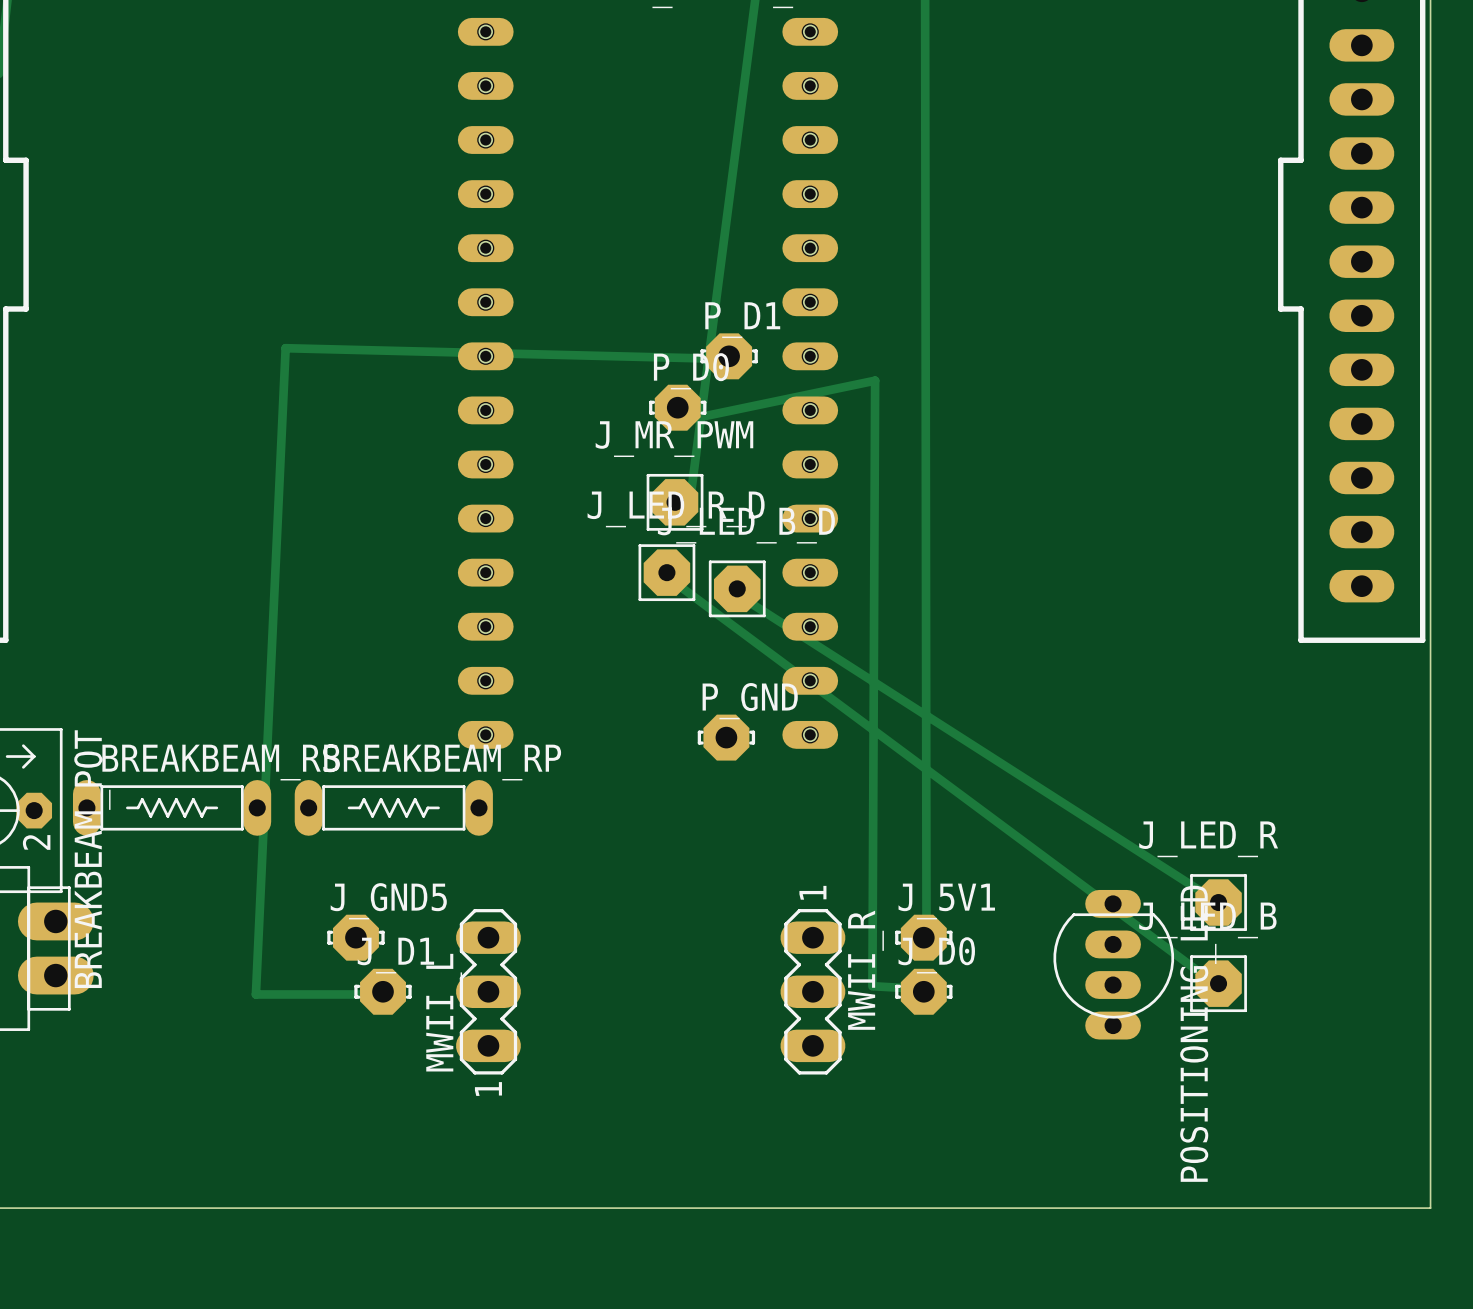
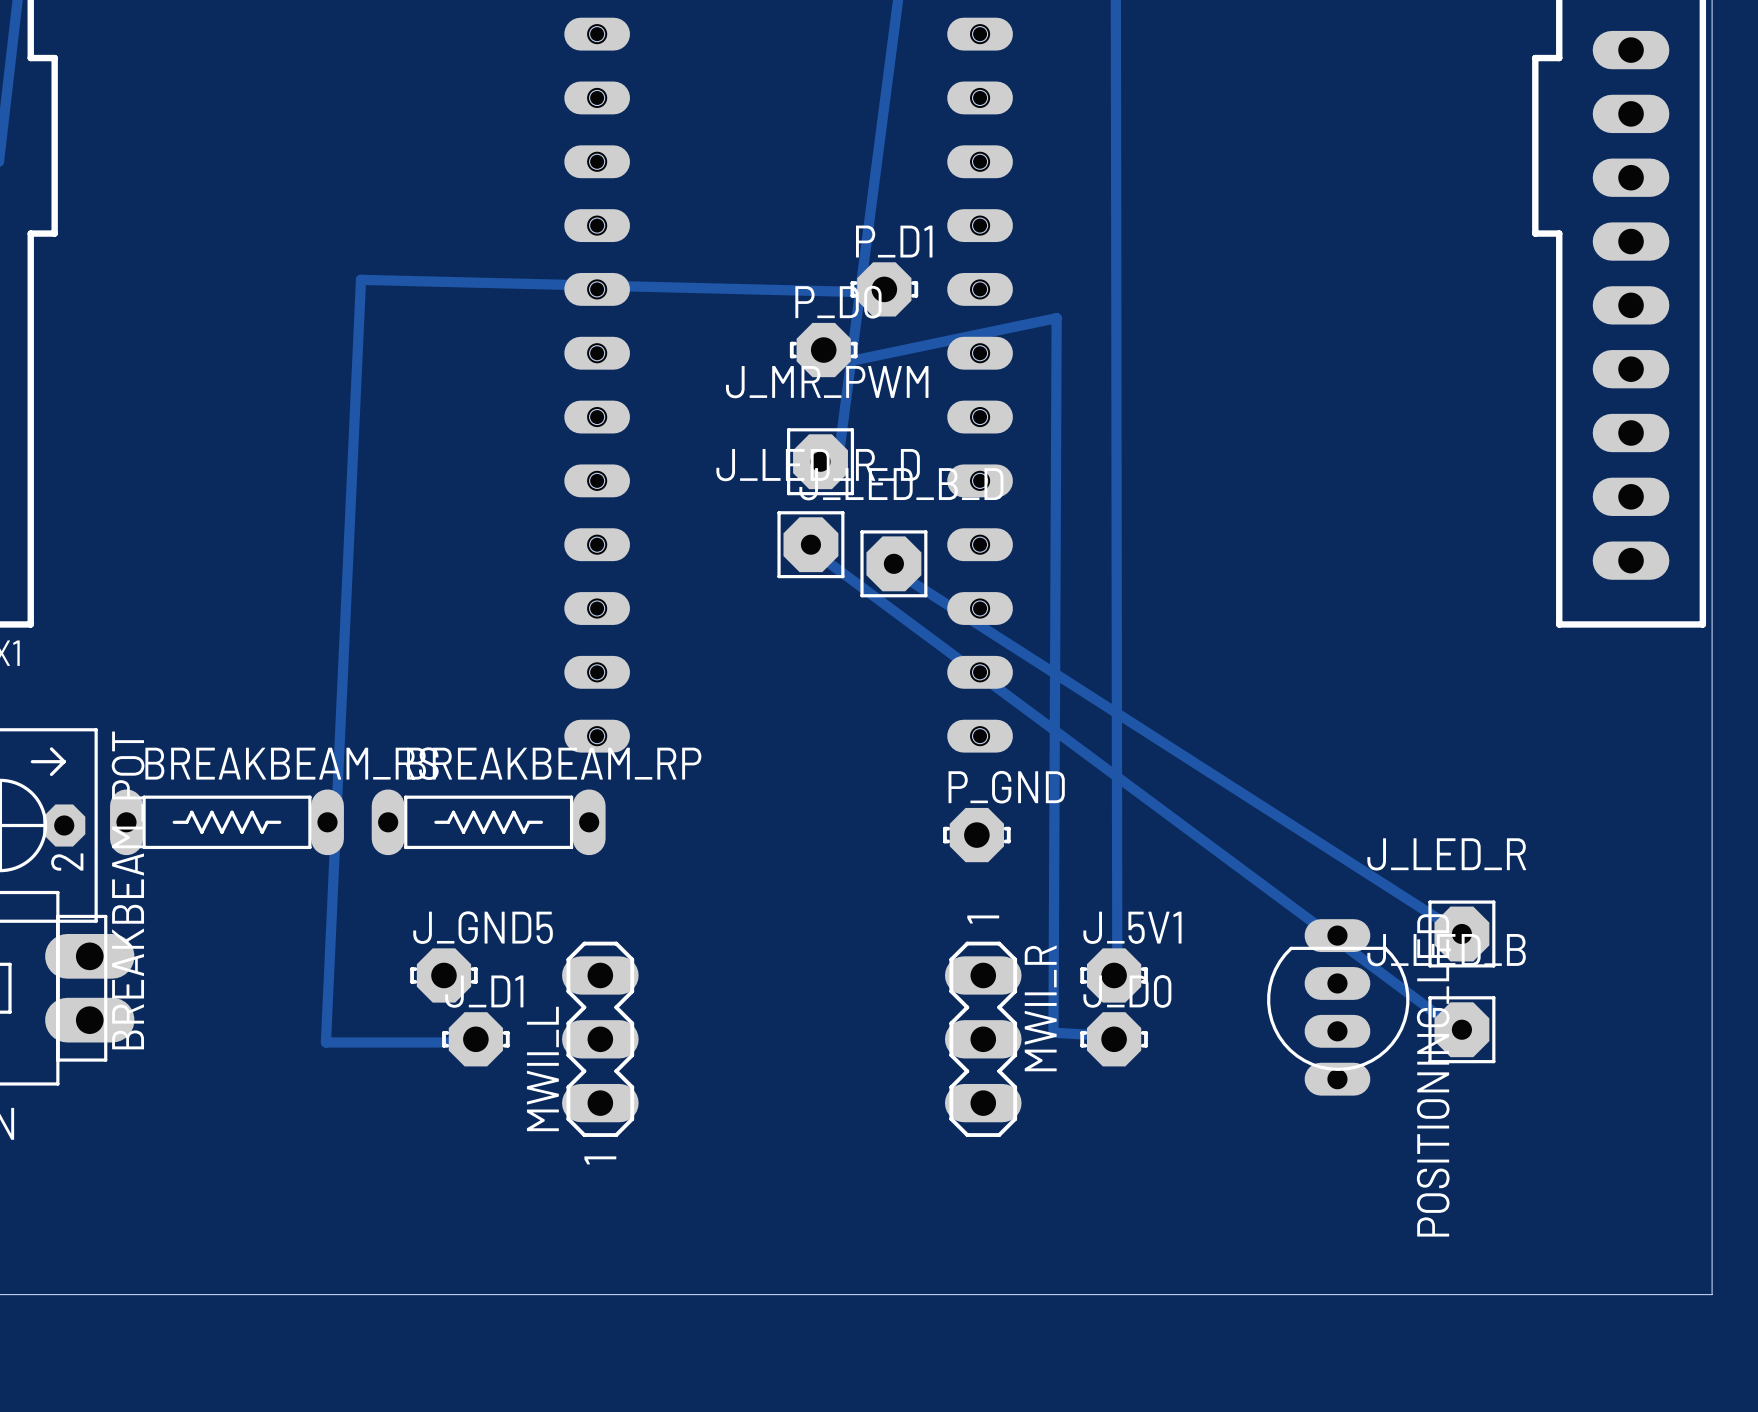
P_GND position: (726, 737) -> (976, 835)

